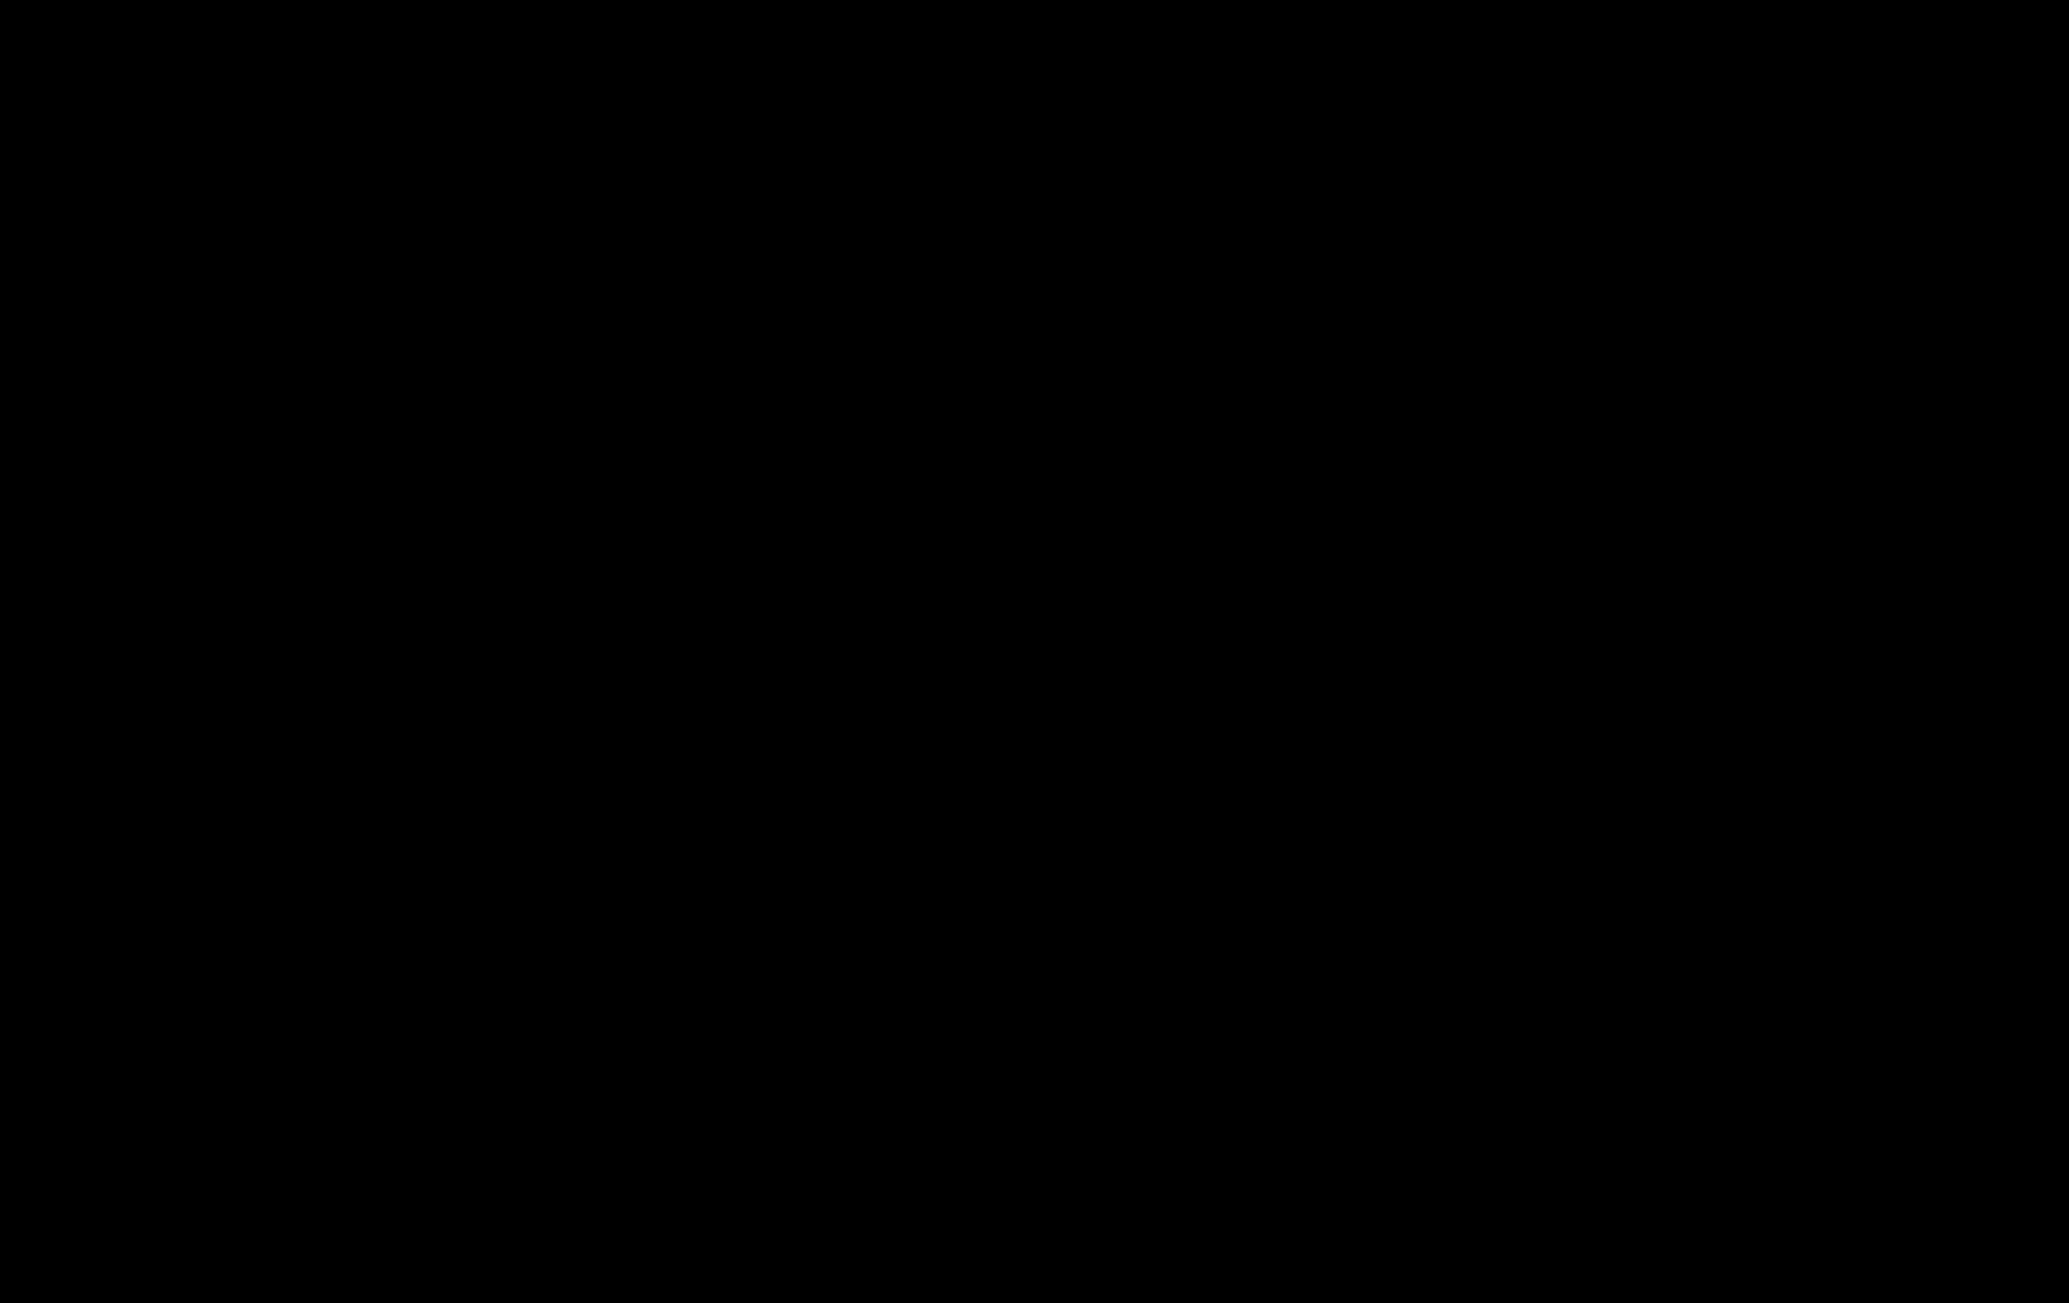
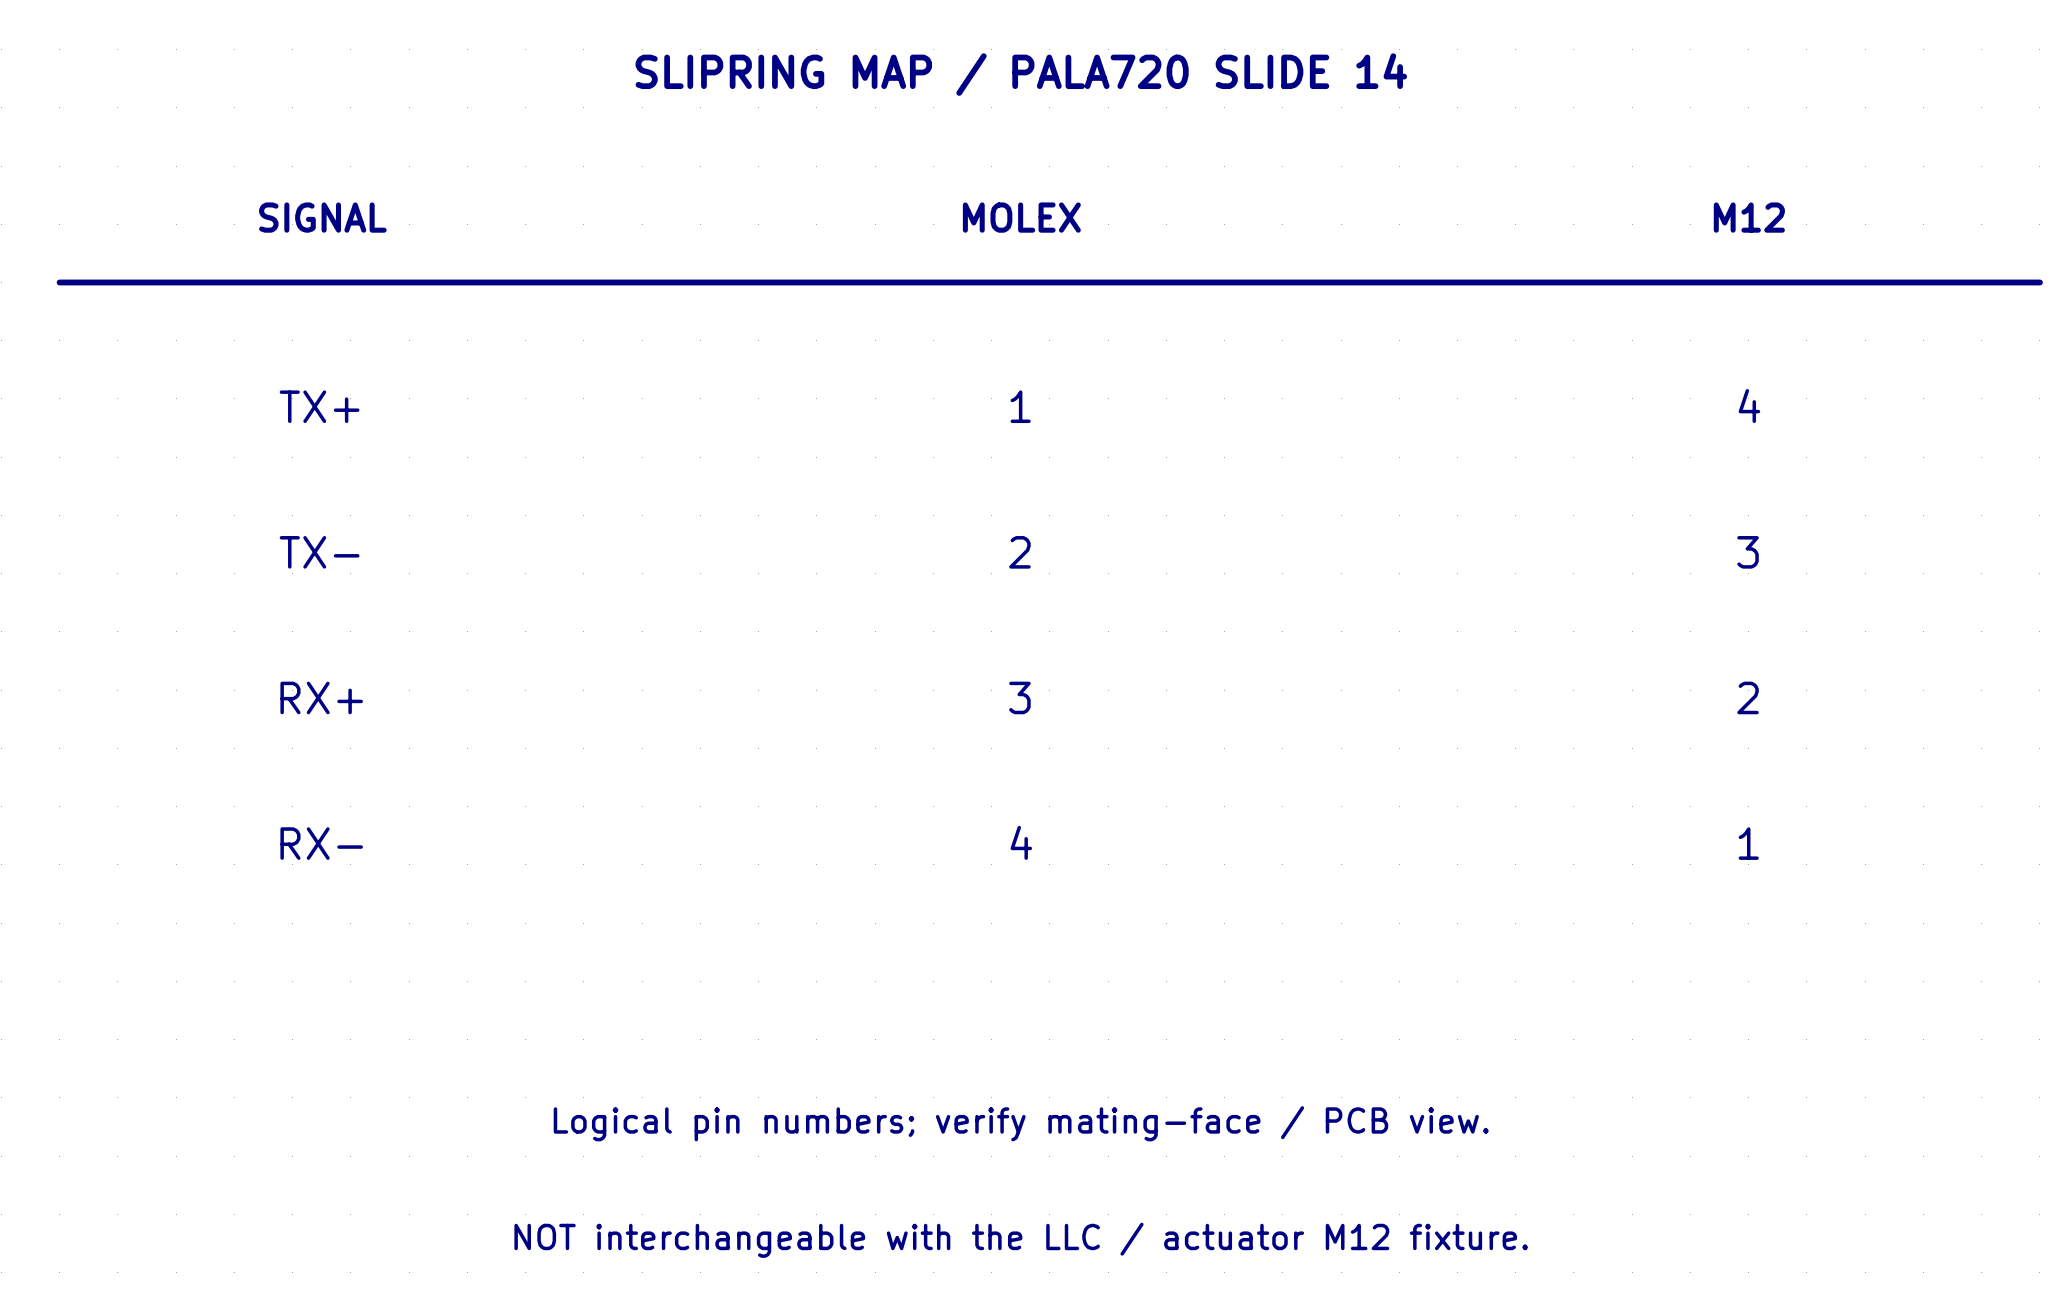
text: none -> SLIPRING MAP / PALA720 SLIDE 14 (1021, 74)
text: none -> SIGNAL (322, 217)
text: none -> MOLEX (1021, 217)
text: none -> M12 (1749, 217)
line: none -> (59, 282) (2039, 282)
text: none -> TX+ (319, 406)
text: none -> 1 (1020, 406)
text: none -> 4 (1749, 406)
text: none -> TX- (319, 552)
text: none -> 2 (1019, 552)
text: none -> 3 (1748, 552)
text: none -> RX+ (321, 697)
text: none -> 3 (1019, 697)
text: none -> 2 (1748, 697)
text: none -> 4 (1021, 842)
text: none -> RX- (321, 843)
text: none -> 1 (1748, 843)
text: none -> Logical pin numbers; verify mating-face / PCB view. (1021, 1123)
text: none -> NOT interchangeable with the LLC / actuator M12 fixture. (1021, 1240)

